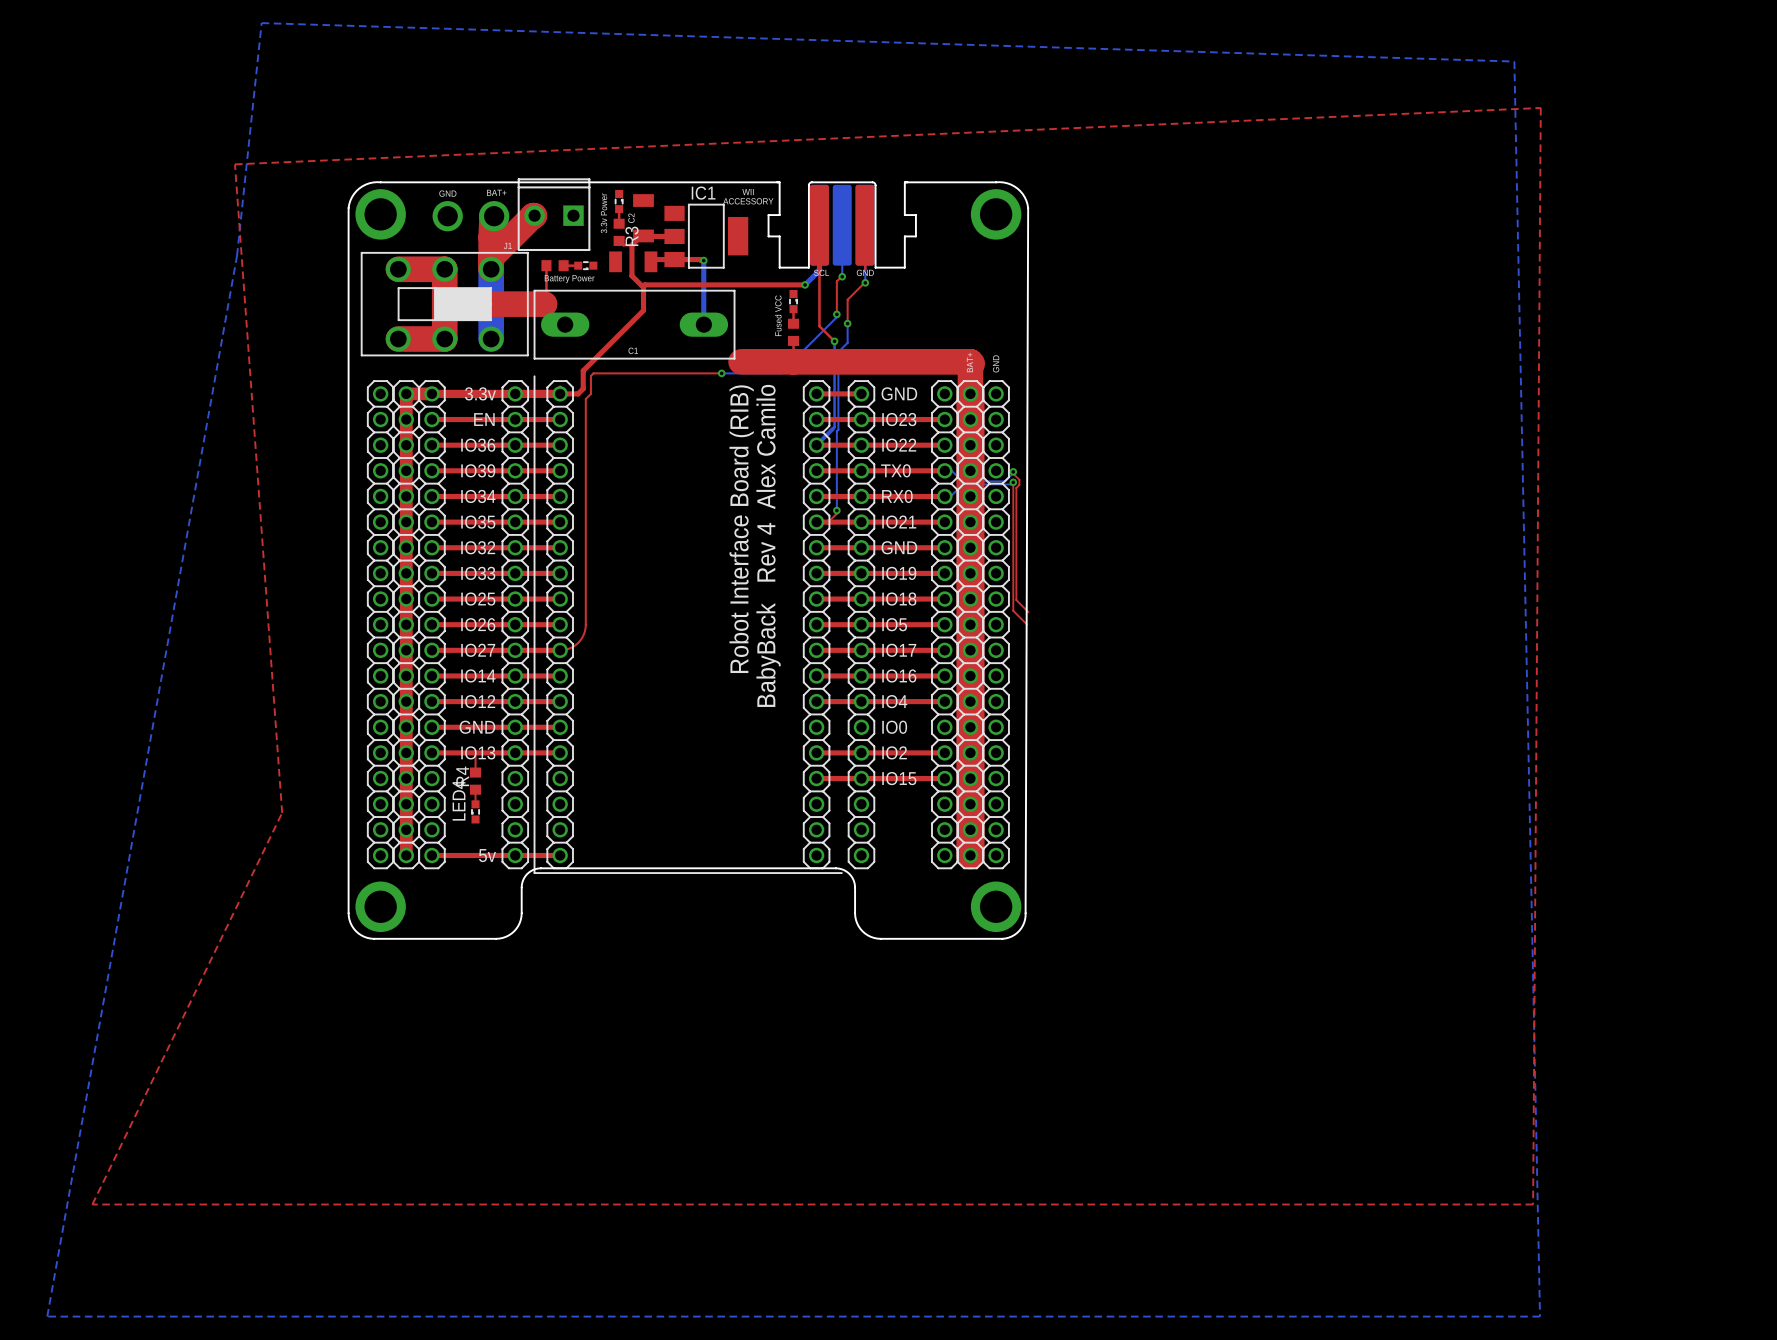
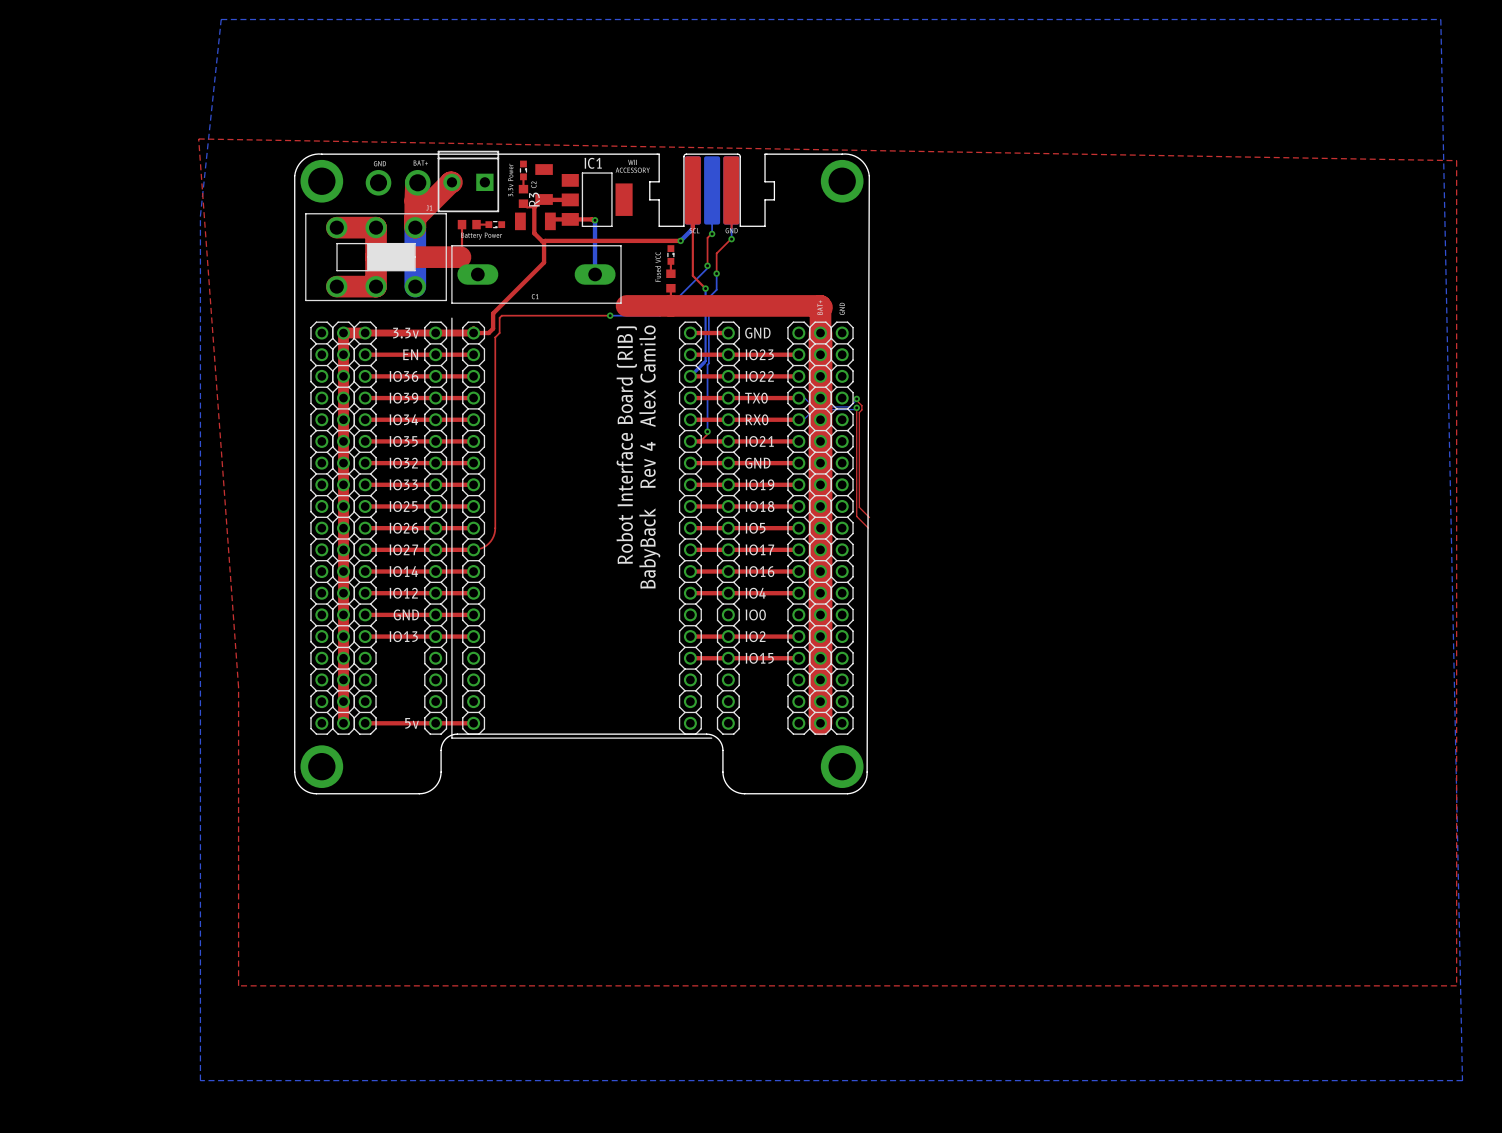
bottom zone outline: (261, 23) (1514, 61) (1540, 1316) (47, 1316) (237, 255) -> (221, 19) (1440, 19) (1462, 1080) (200, 1080) (200, 216)
top zone outline: (234, 164) (1540, 107) (1533, 1204) (92, 1204) (282, 812) -> (198, 138) (1456, 160) (1456, 985) (238, 985) (238, 687)
top track: (475, 752) (475, 772) -> none
R4: (475, 781) -> none
top track: (475, 789) (475, 804) -> none
LED4: (475, 811) -> none

